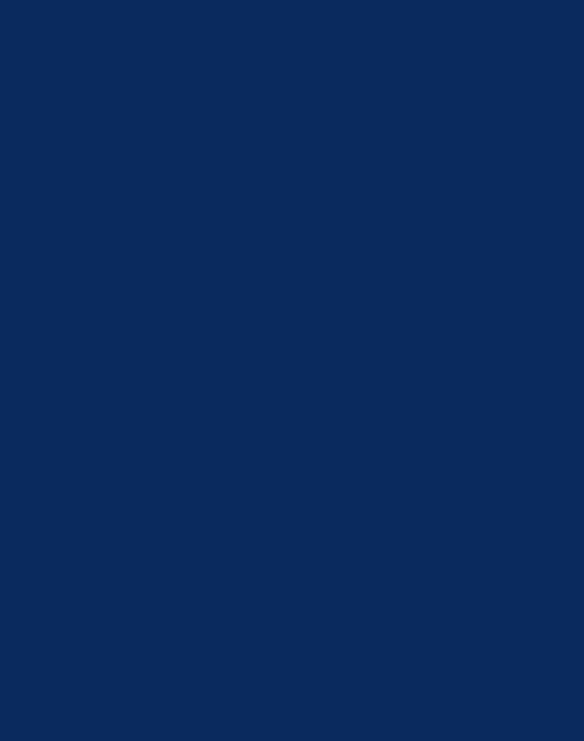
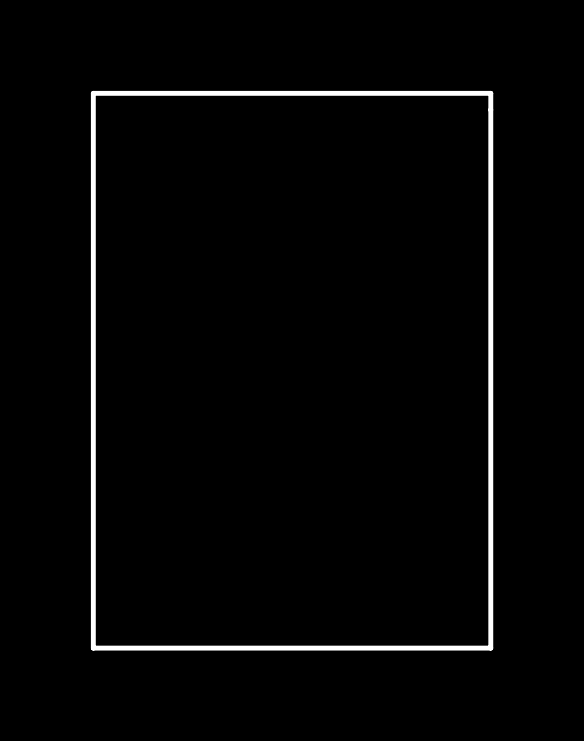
board edge: none -> (490, 93) (93, 93) (93, 648) (490, 648) (490, 93)

